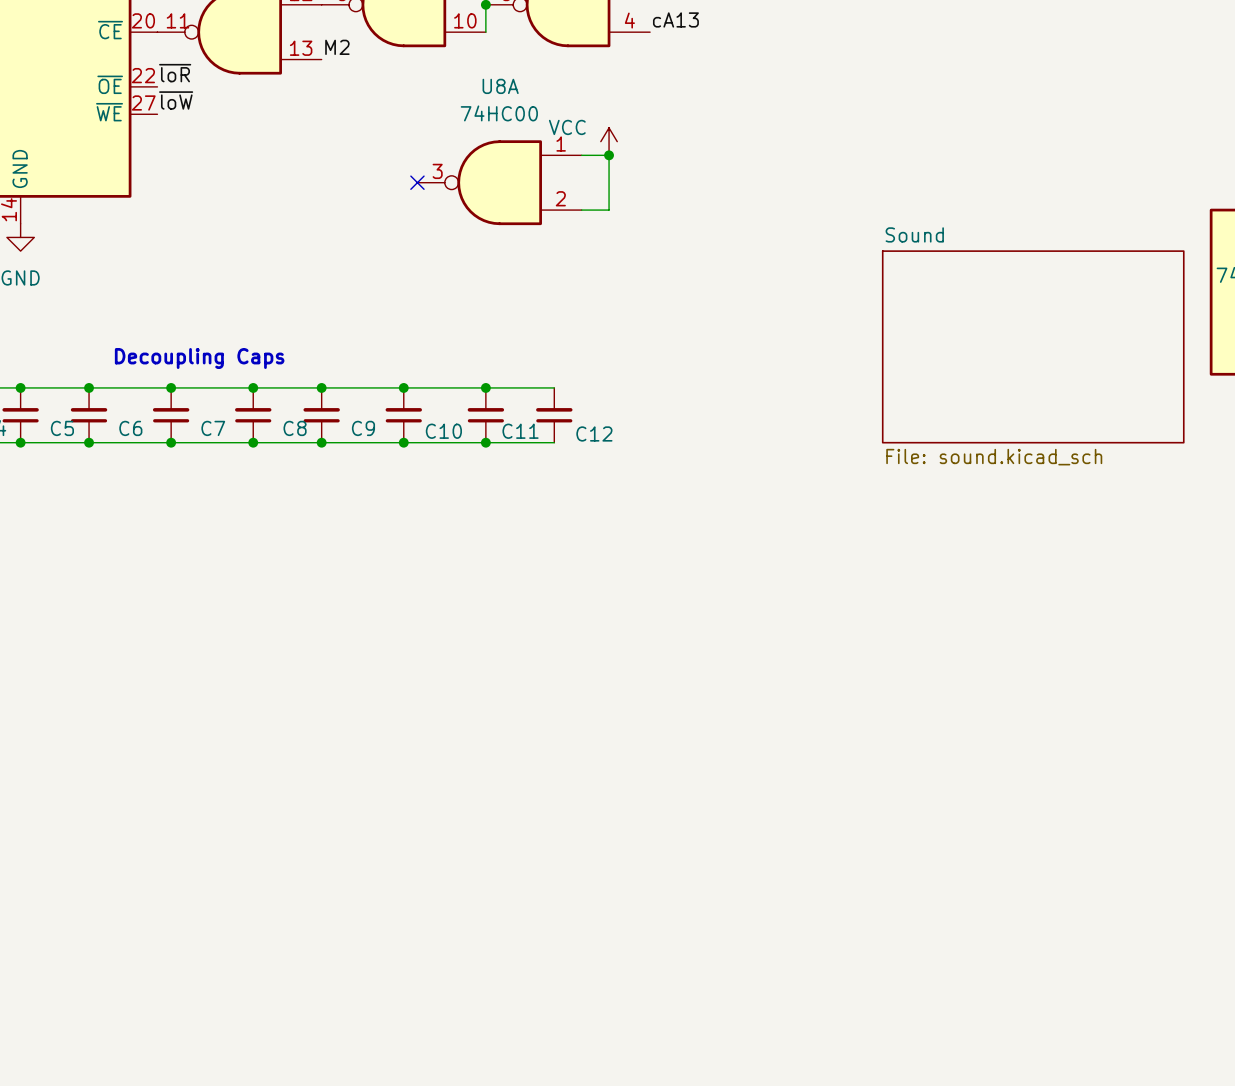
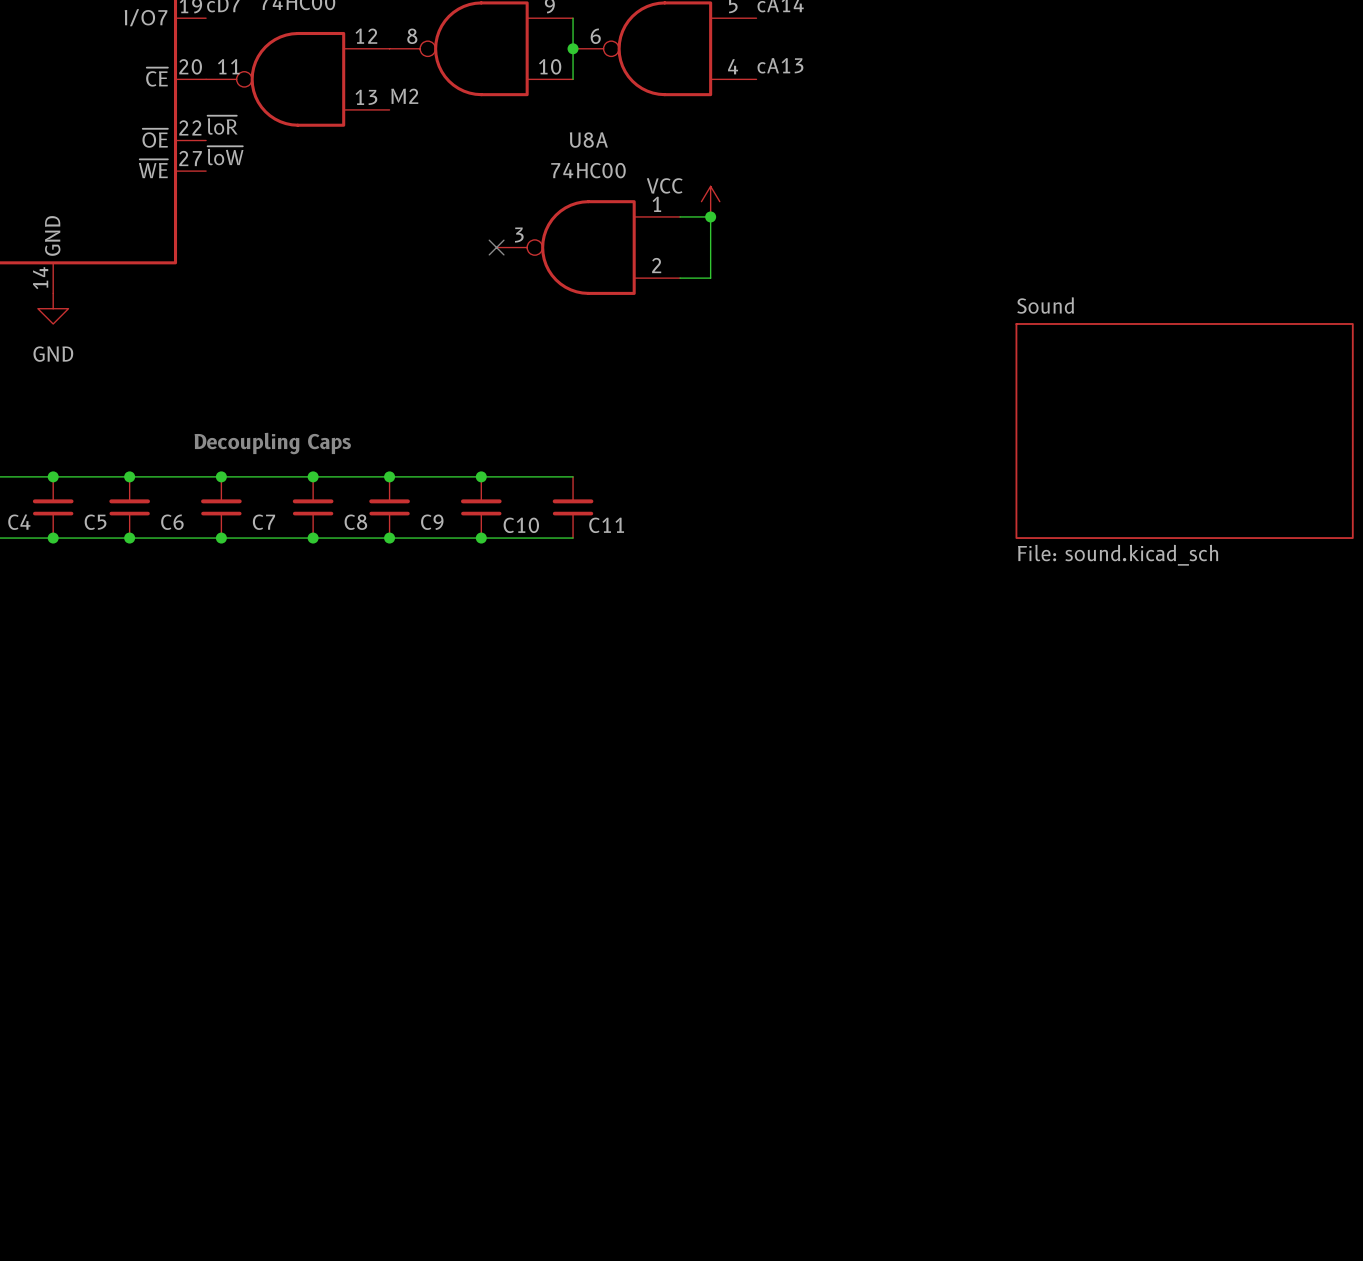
wire: (485, 387) (554, 387) -> none
junction: (485, 387) -> none
C12: (554, 415) -> none
wire: (485, 442) (554, 442) -> none
junction: (485, 442) -> none

